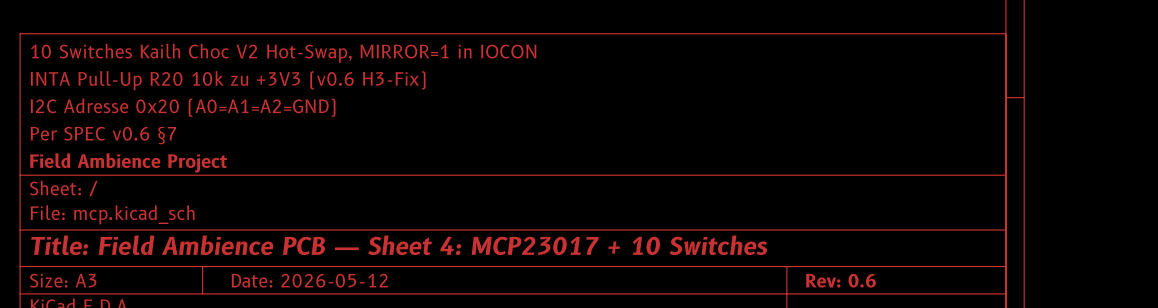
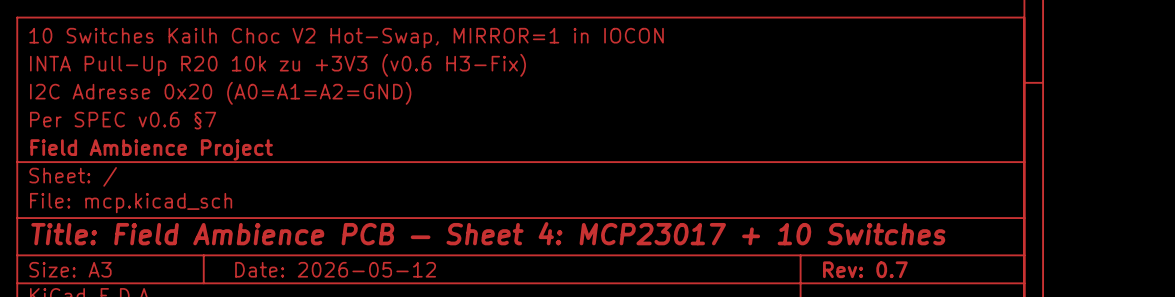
title block: Rev: 0.6 (840, 280) -> Rev: 0.7 (865, 269)

